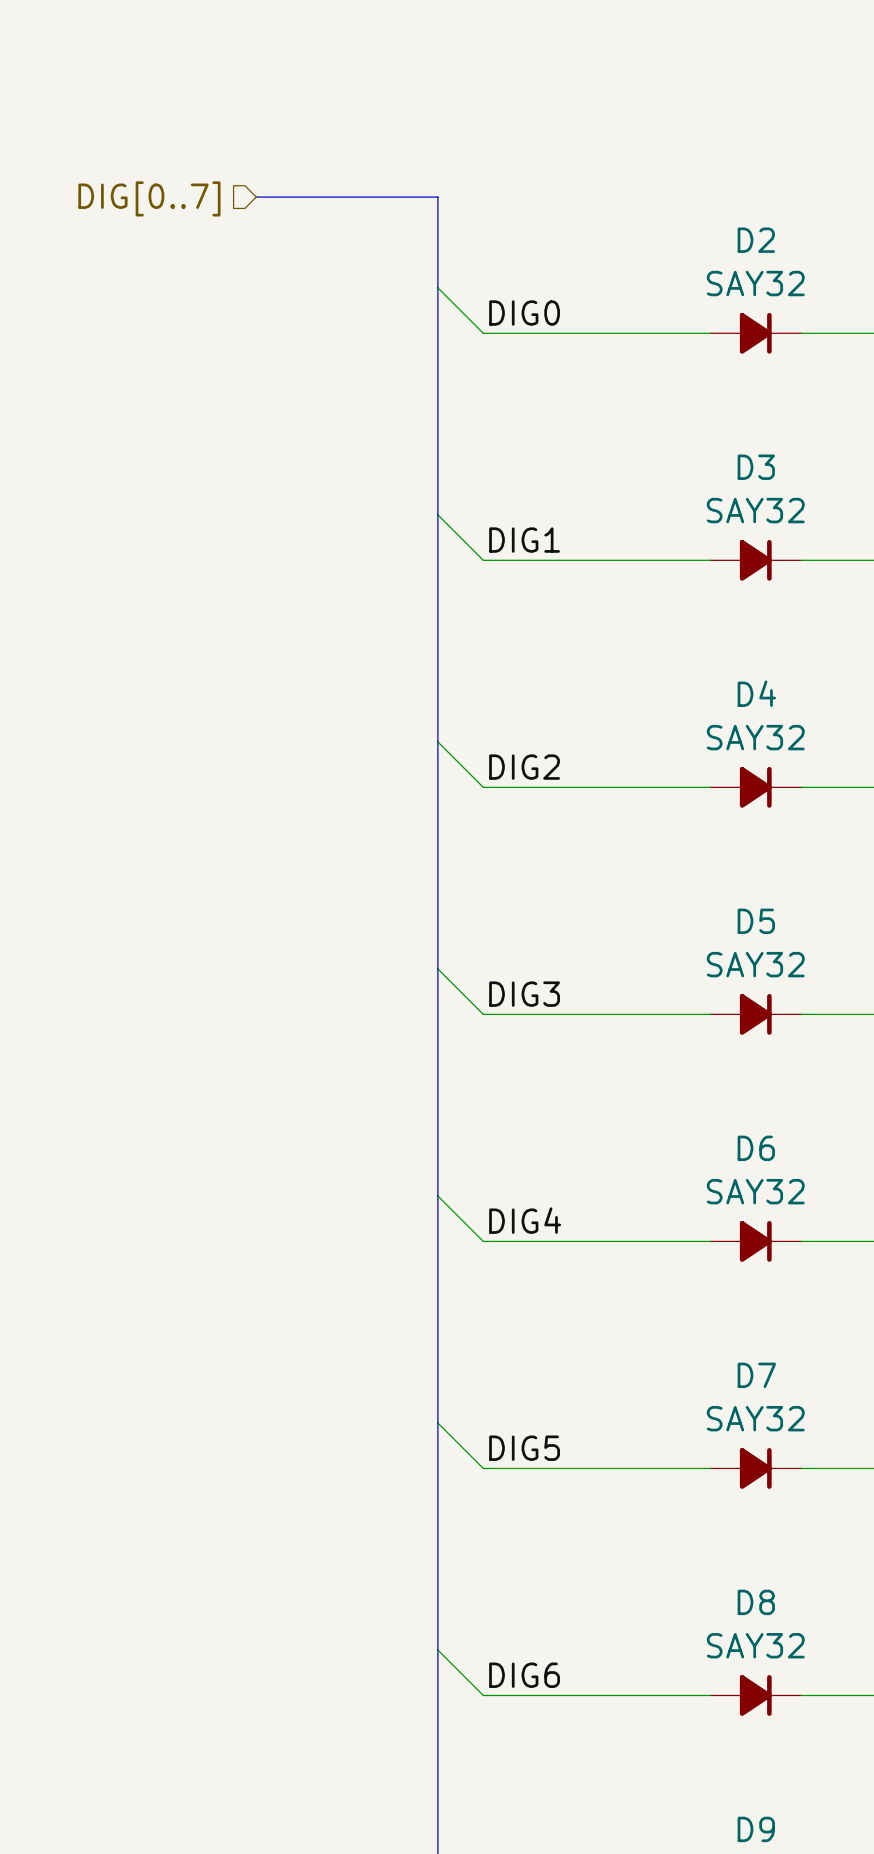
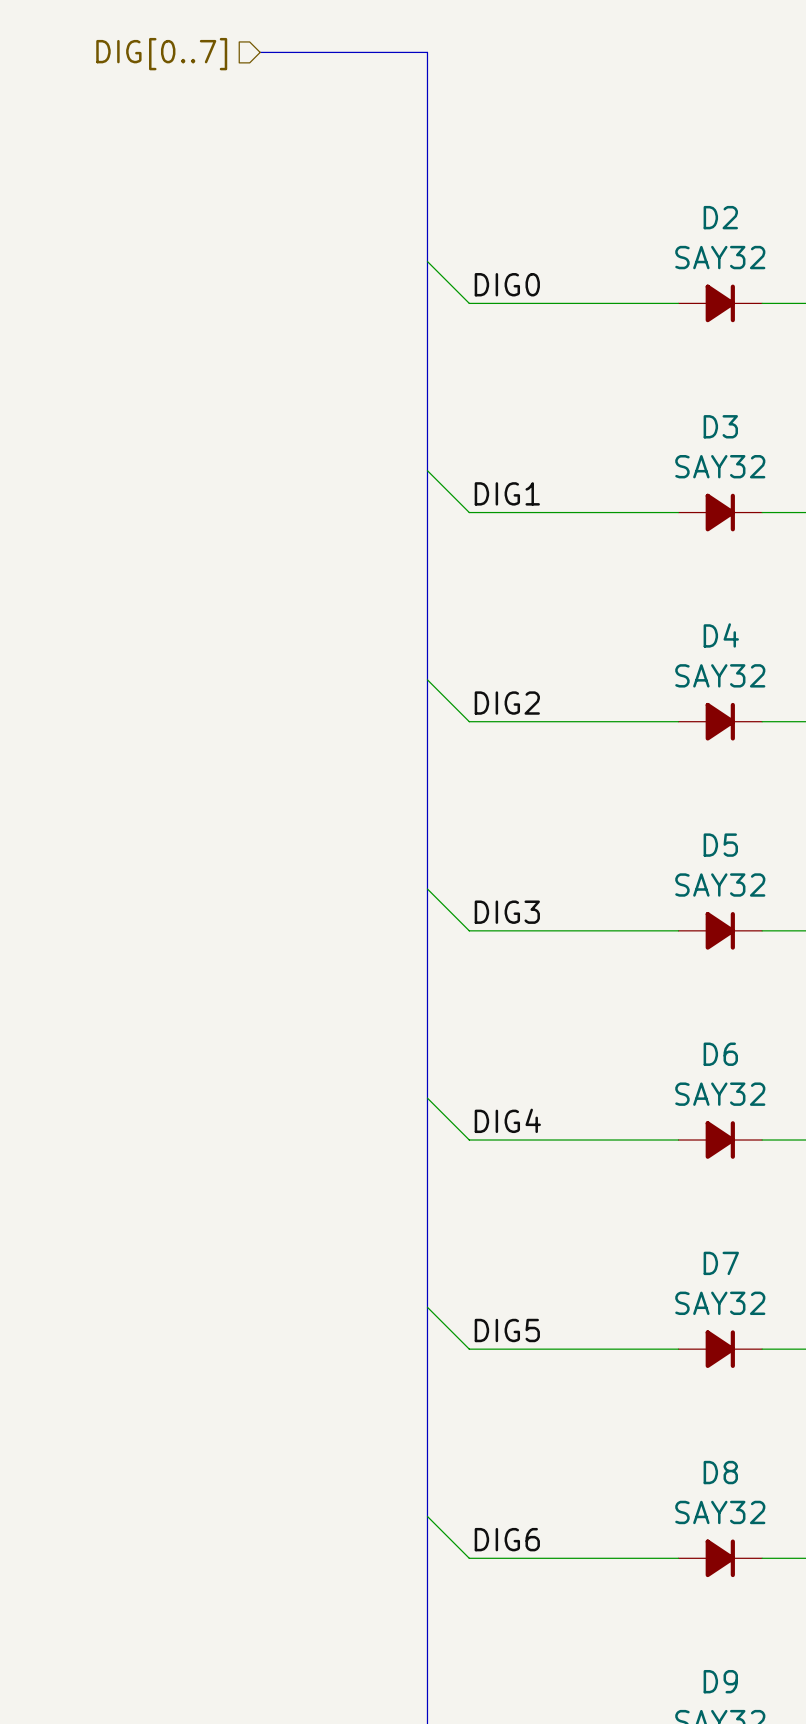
bus: (256, 197) (437, 197) -> (260, 52) (427, 52) (427, 177)
hierarchical label position: DIG[0..7] (149, 198) -> DIG[0..7] (161, 54)

